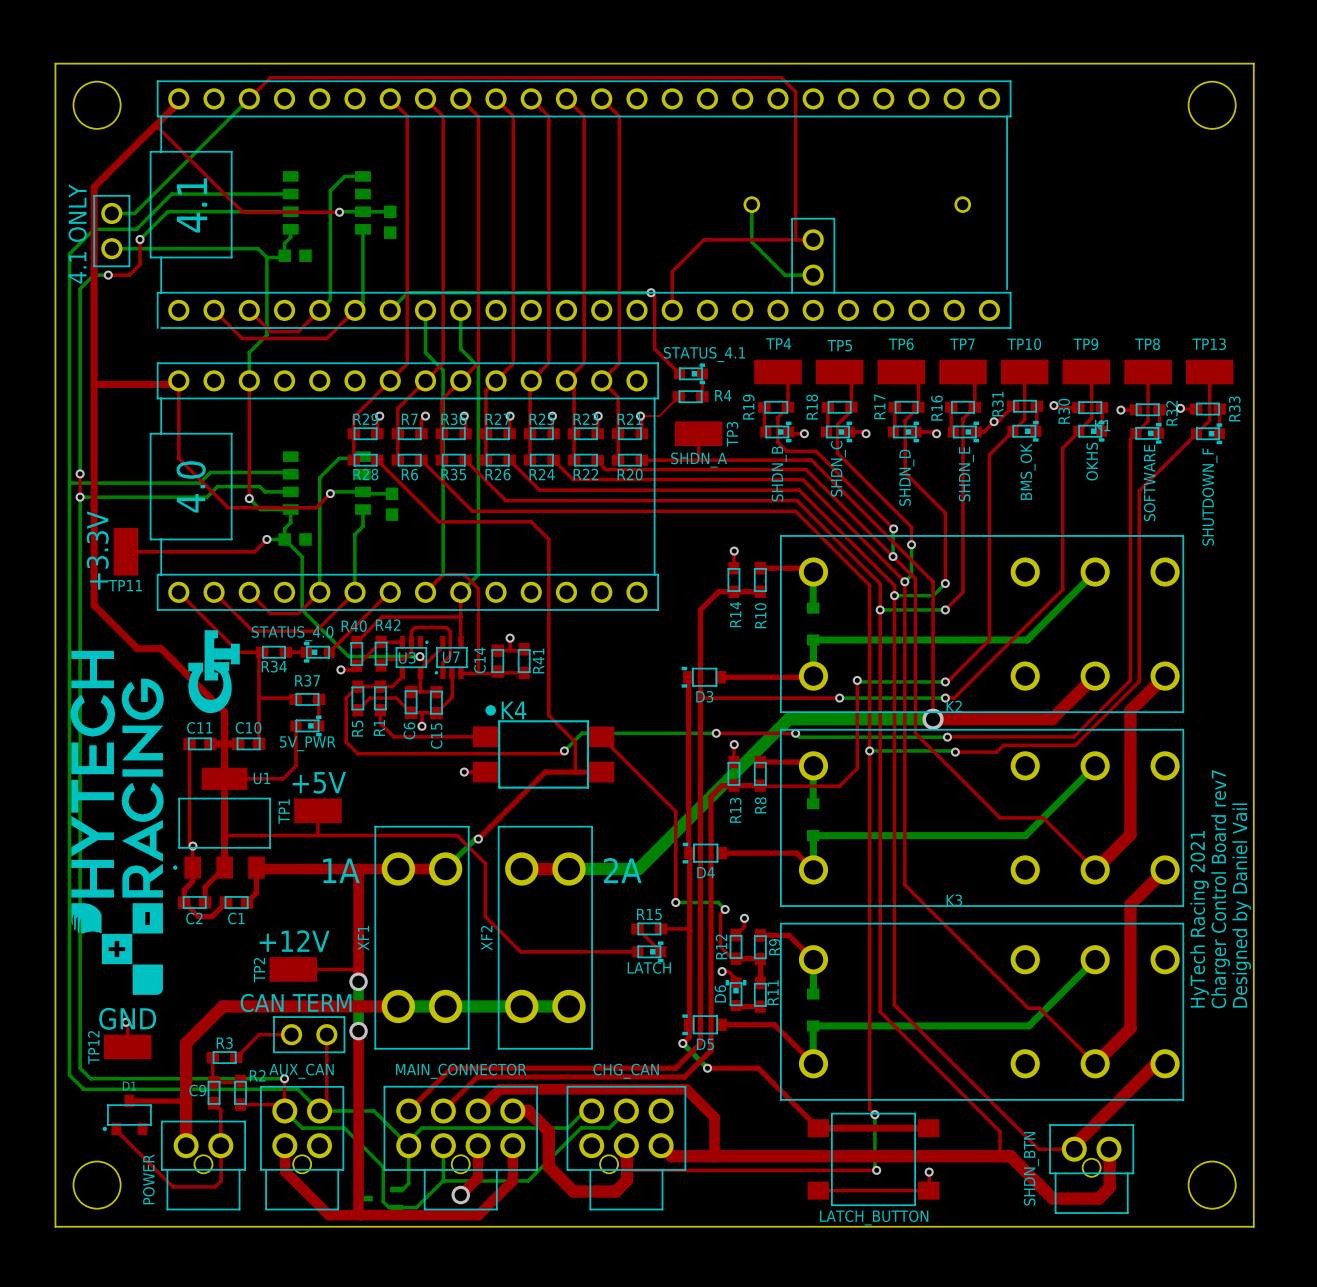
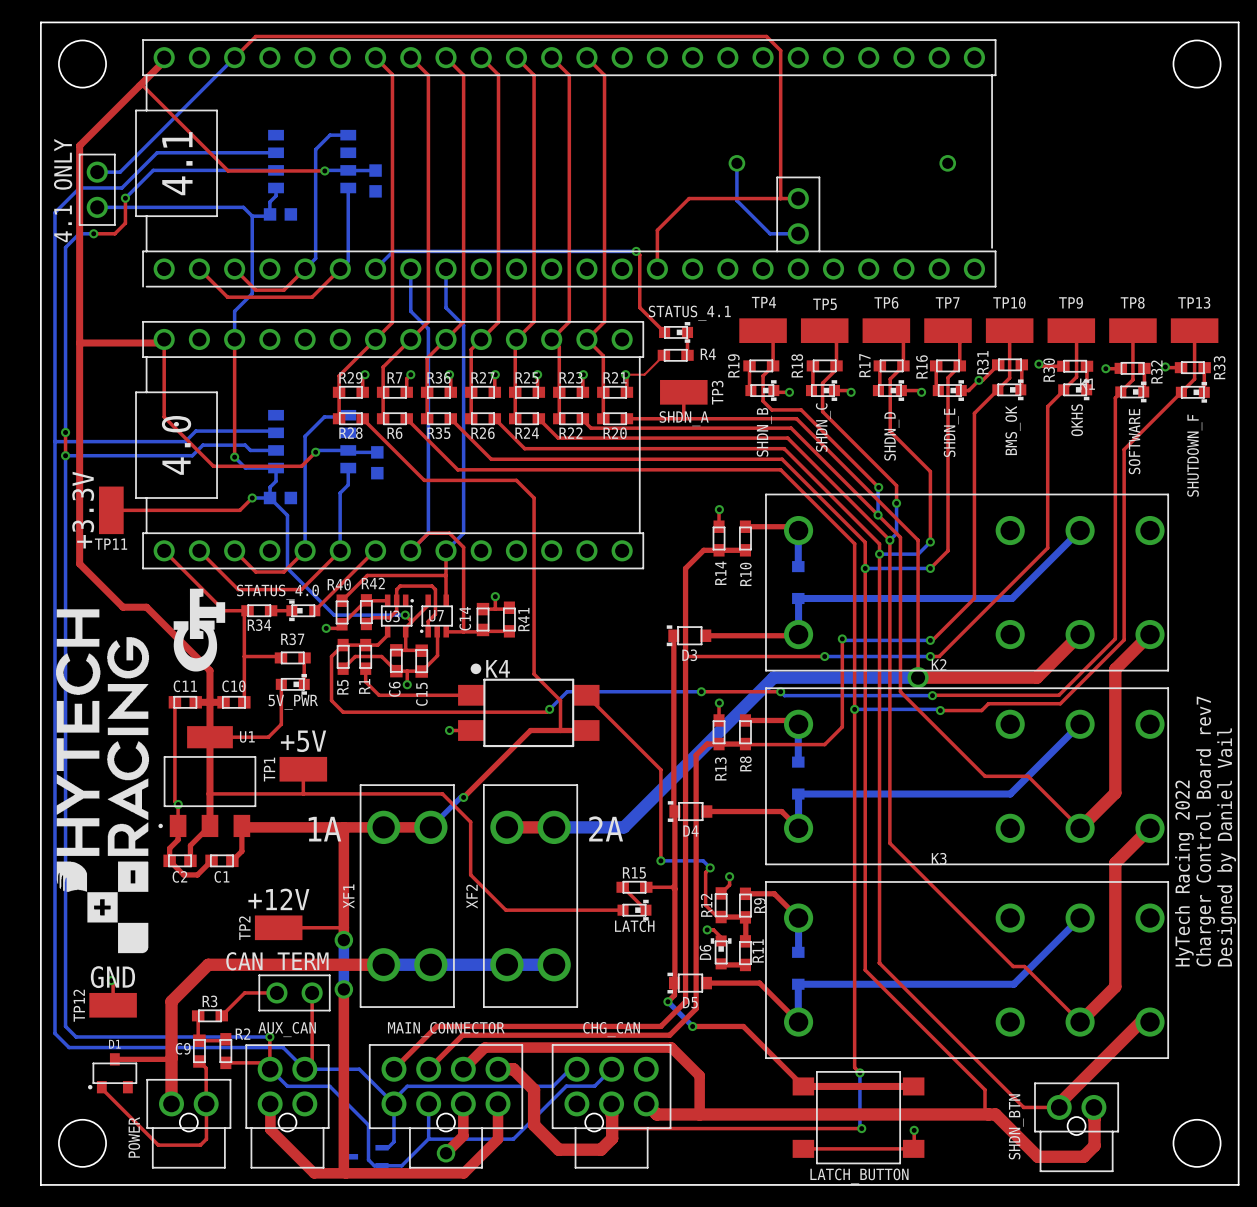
text: HyTech Racing 2021 (1199, 919) -> HyTech Racing 2022 (1184, 873)

